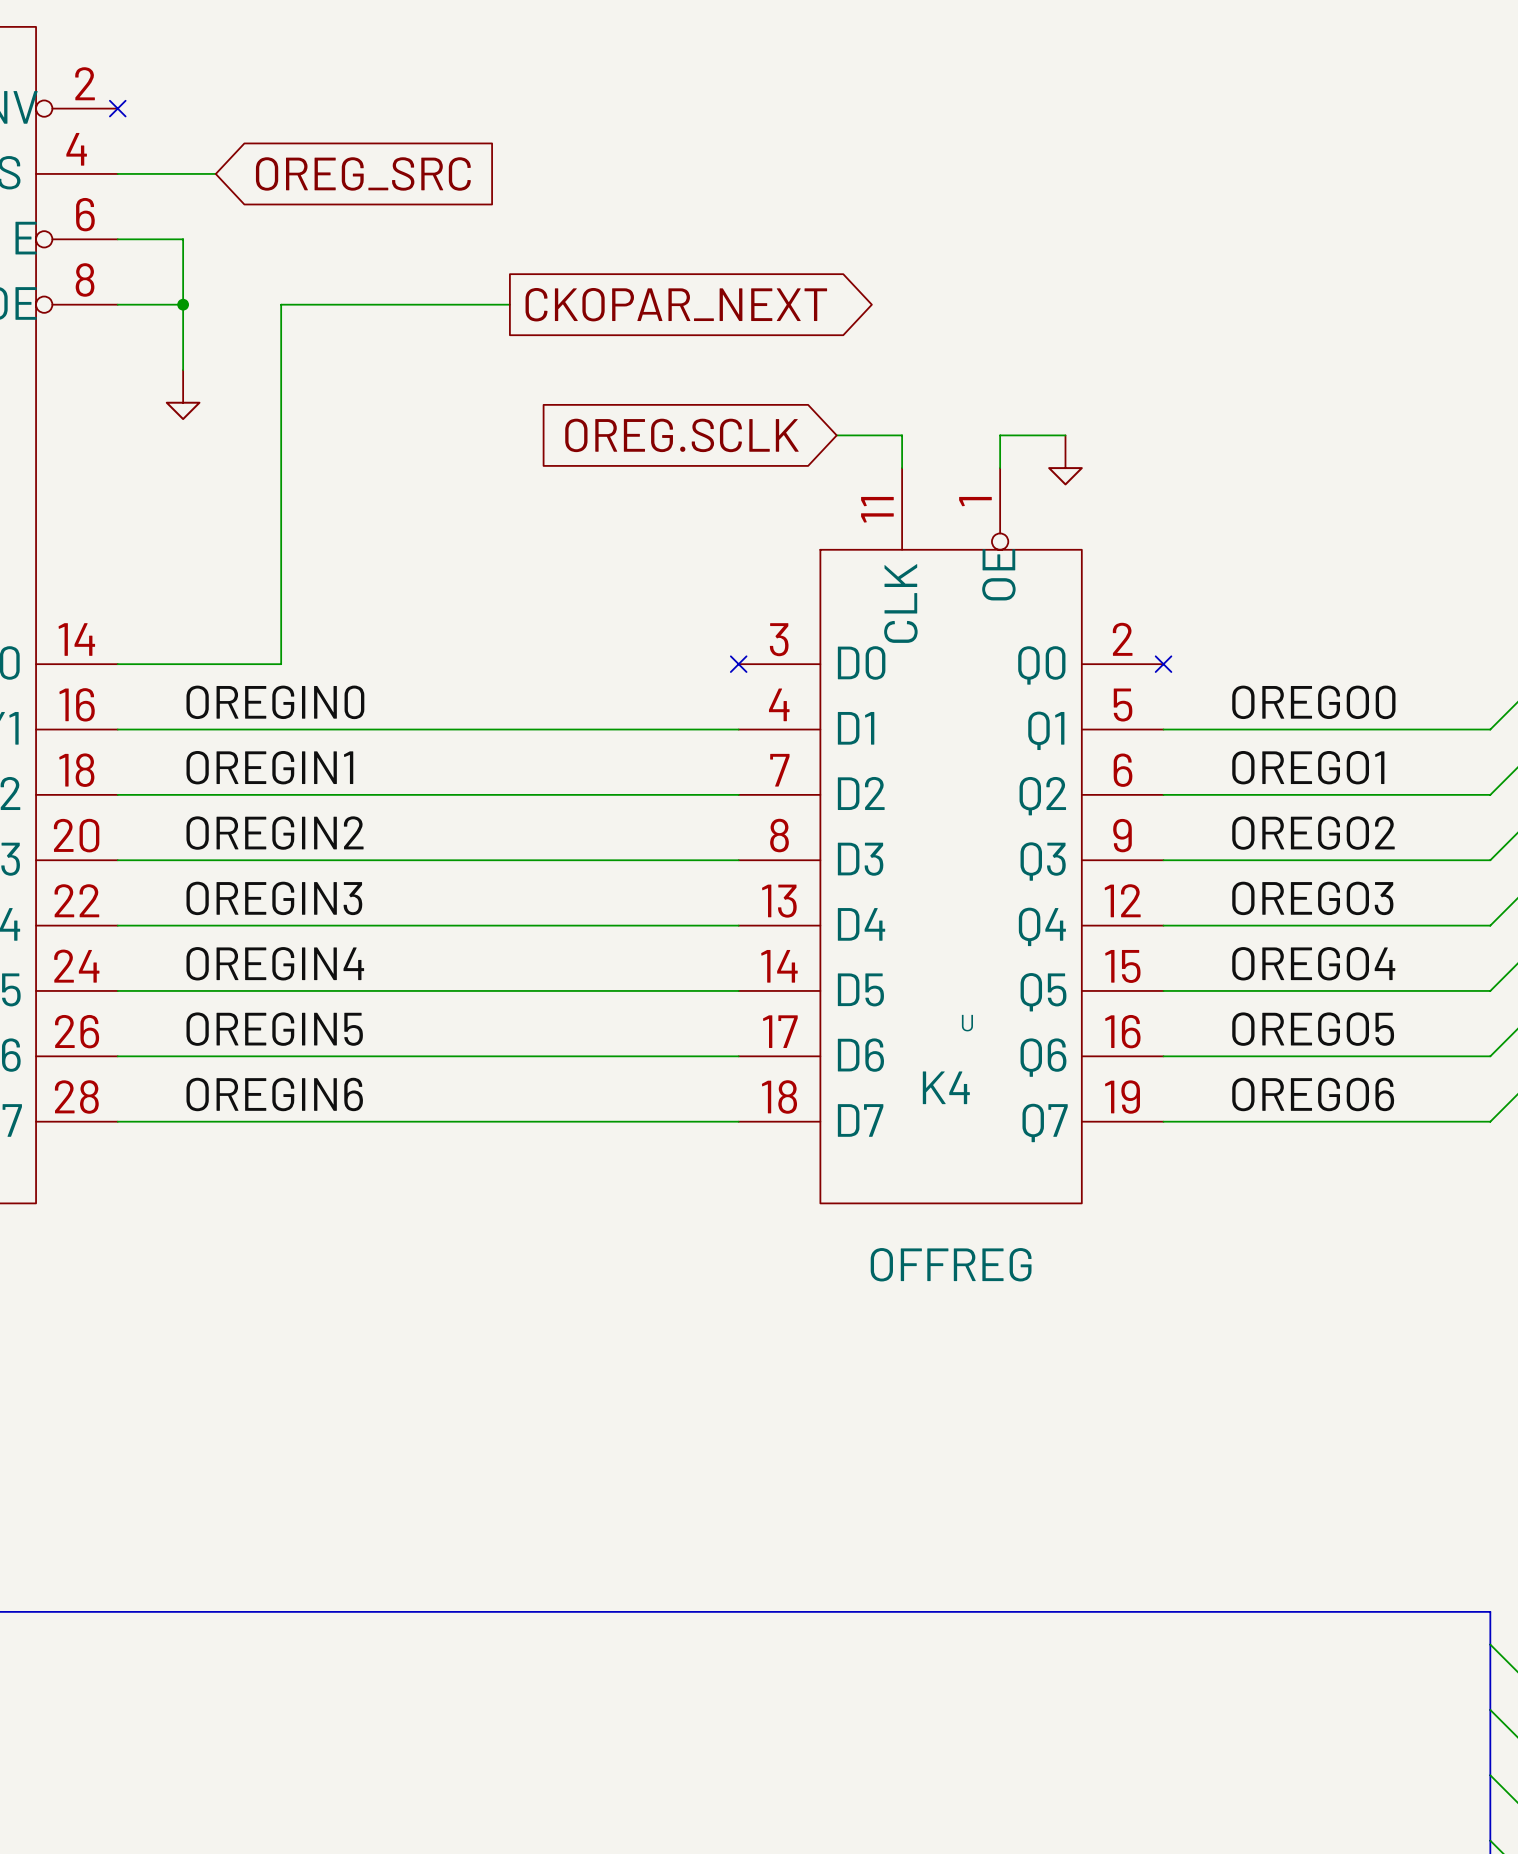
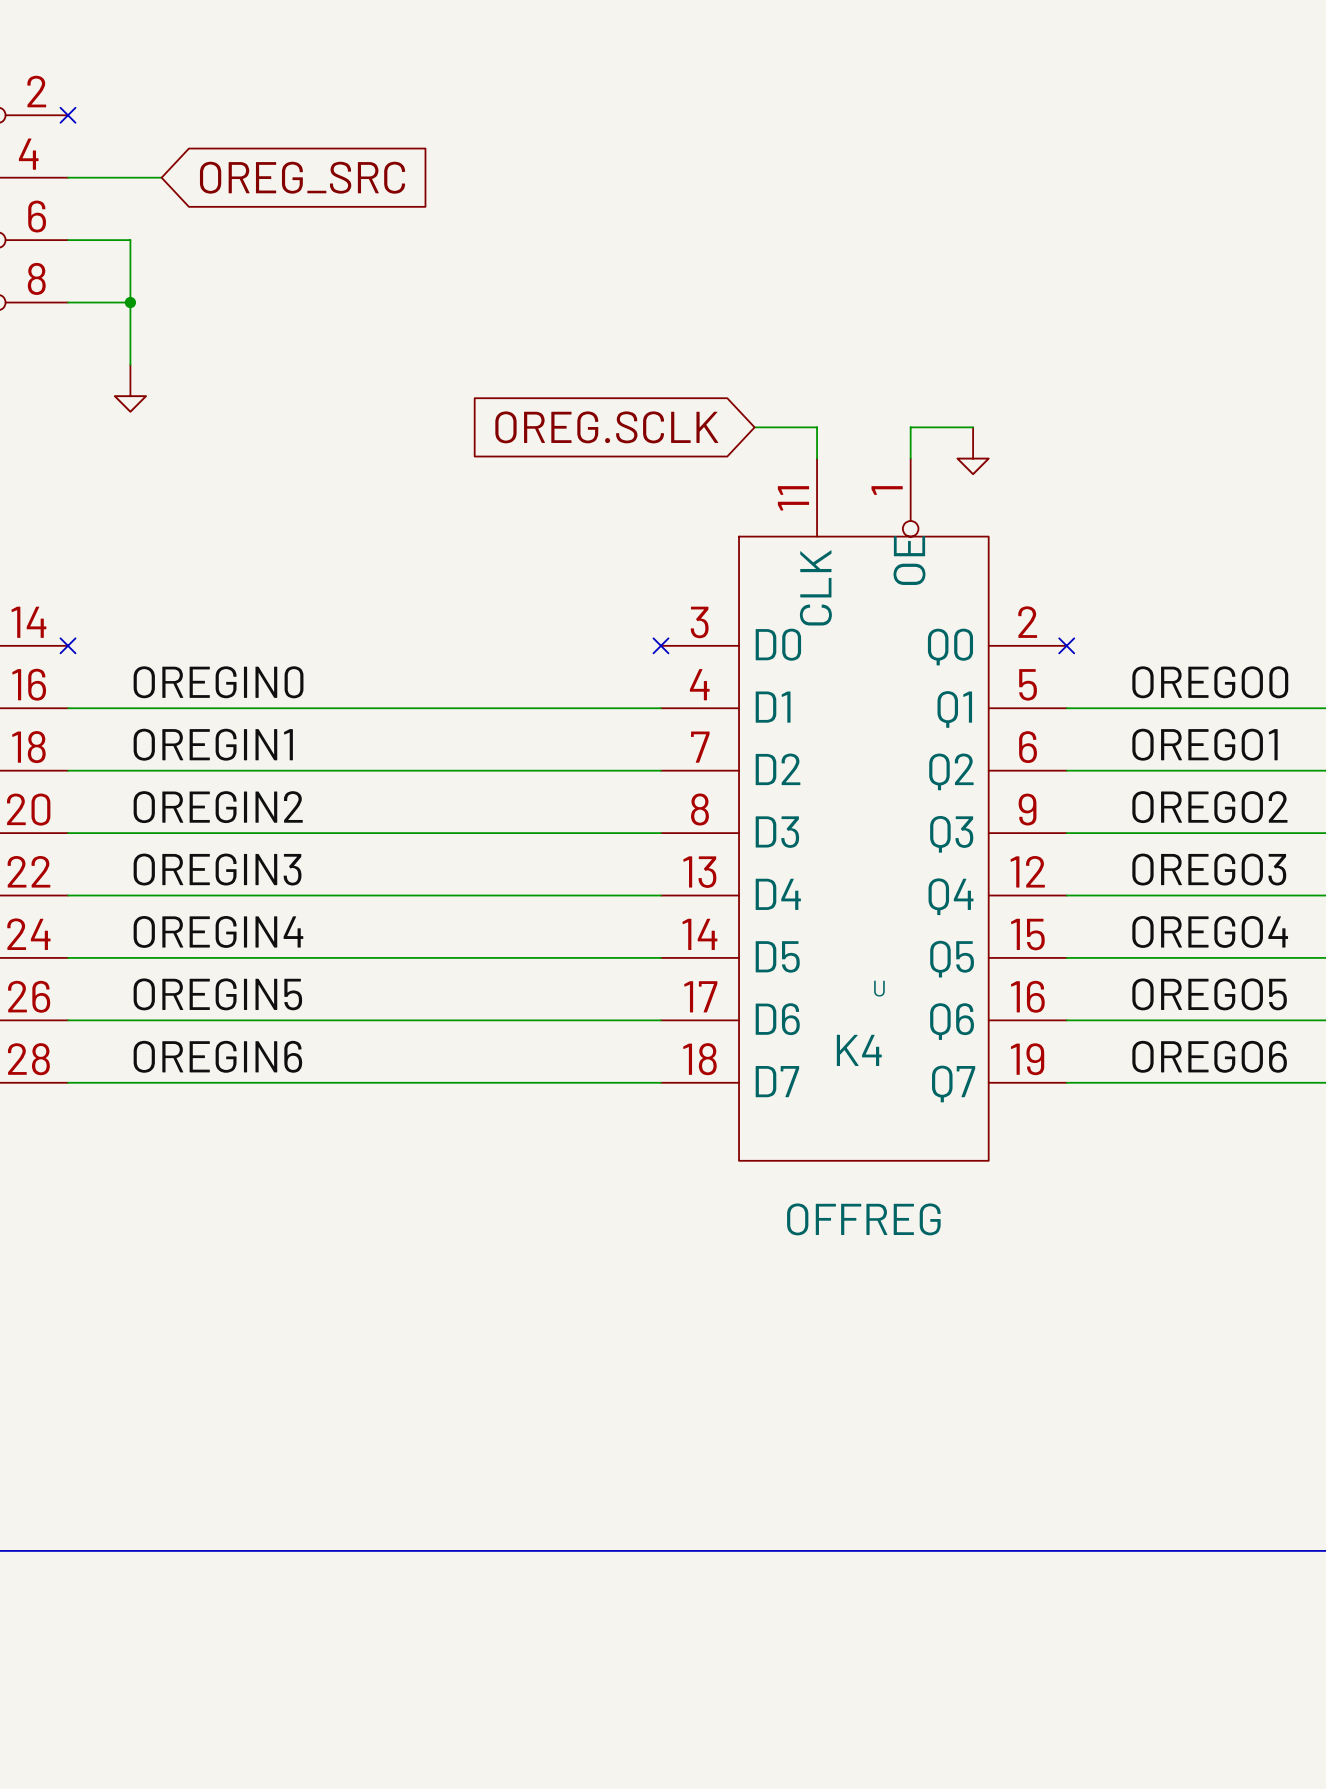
wire: (509, 304) (281, 304) (281, 664) (117, 664) -> none
global label: CKOPAR_NEXT (676, 304) -> none
no-connect mark: none -> (68, 645)

